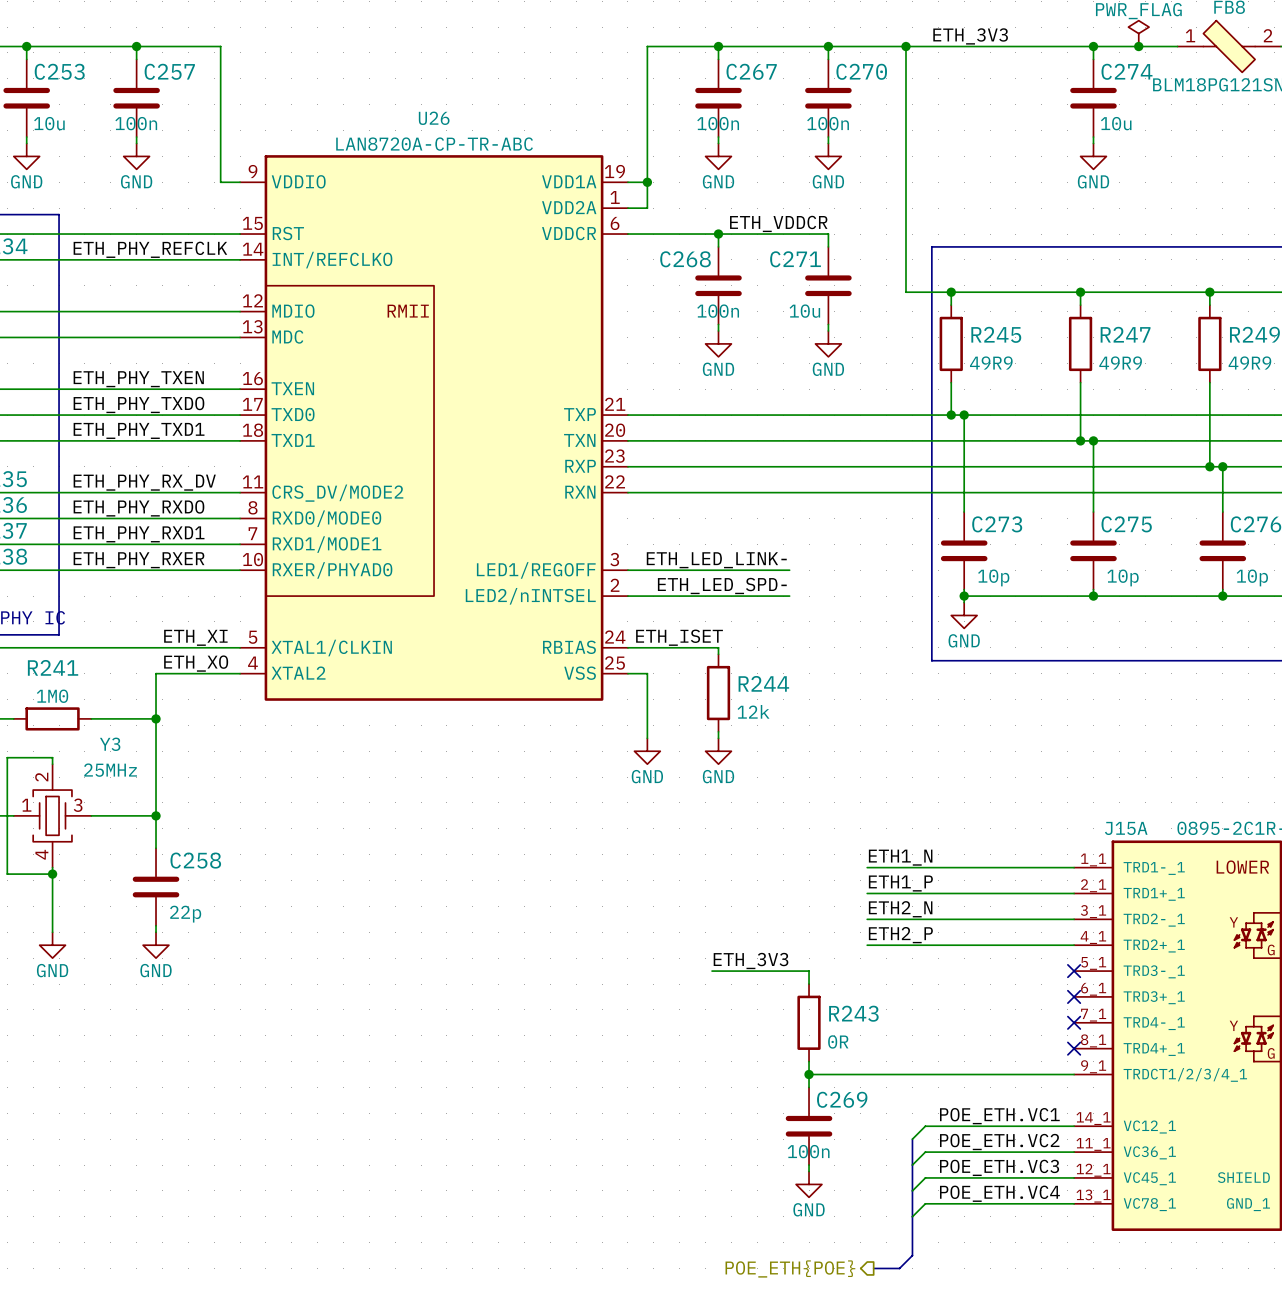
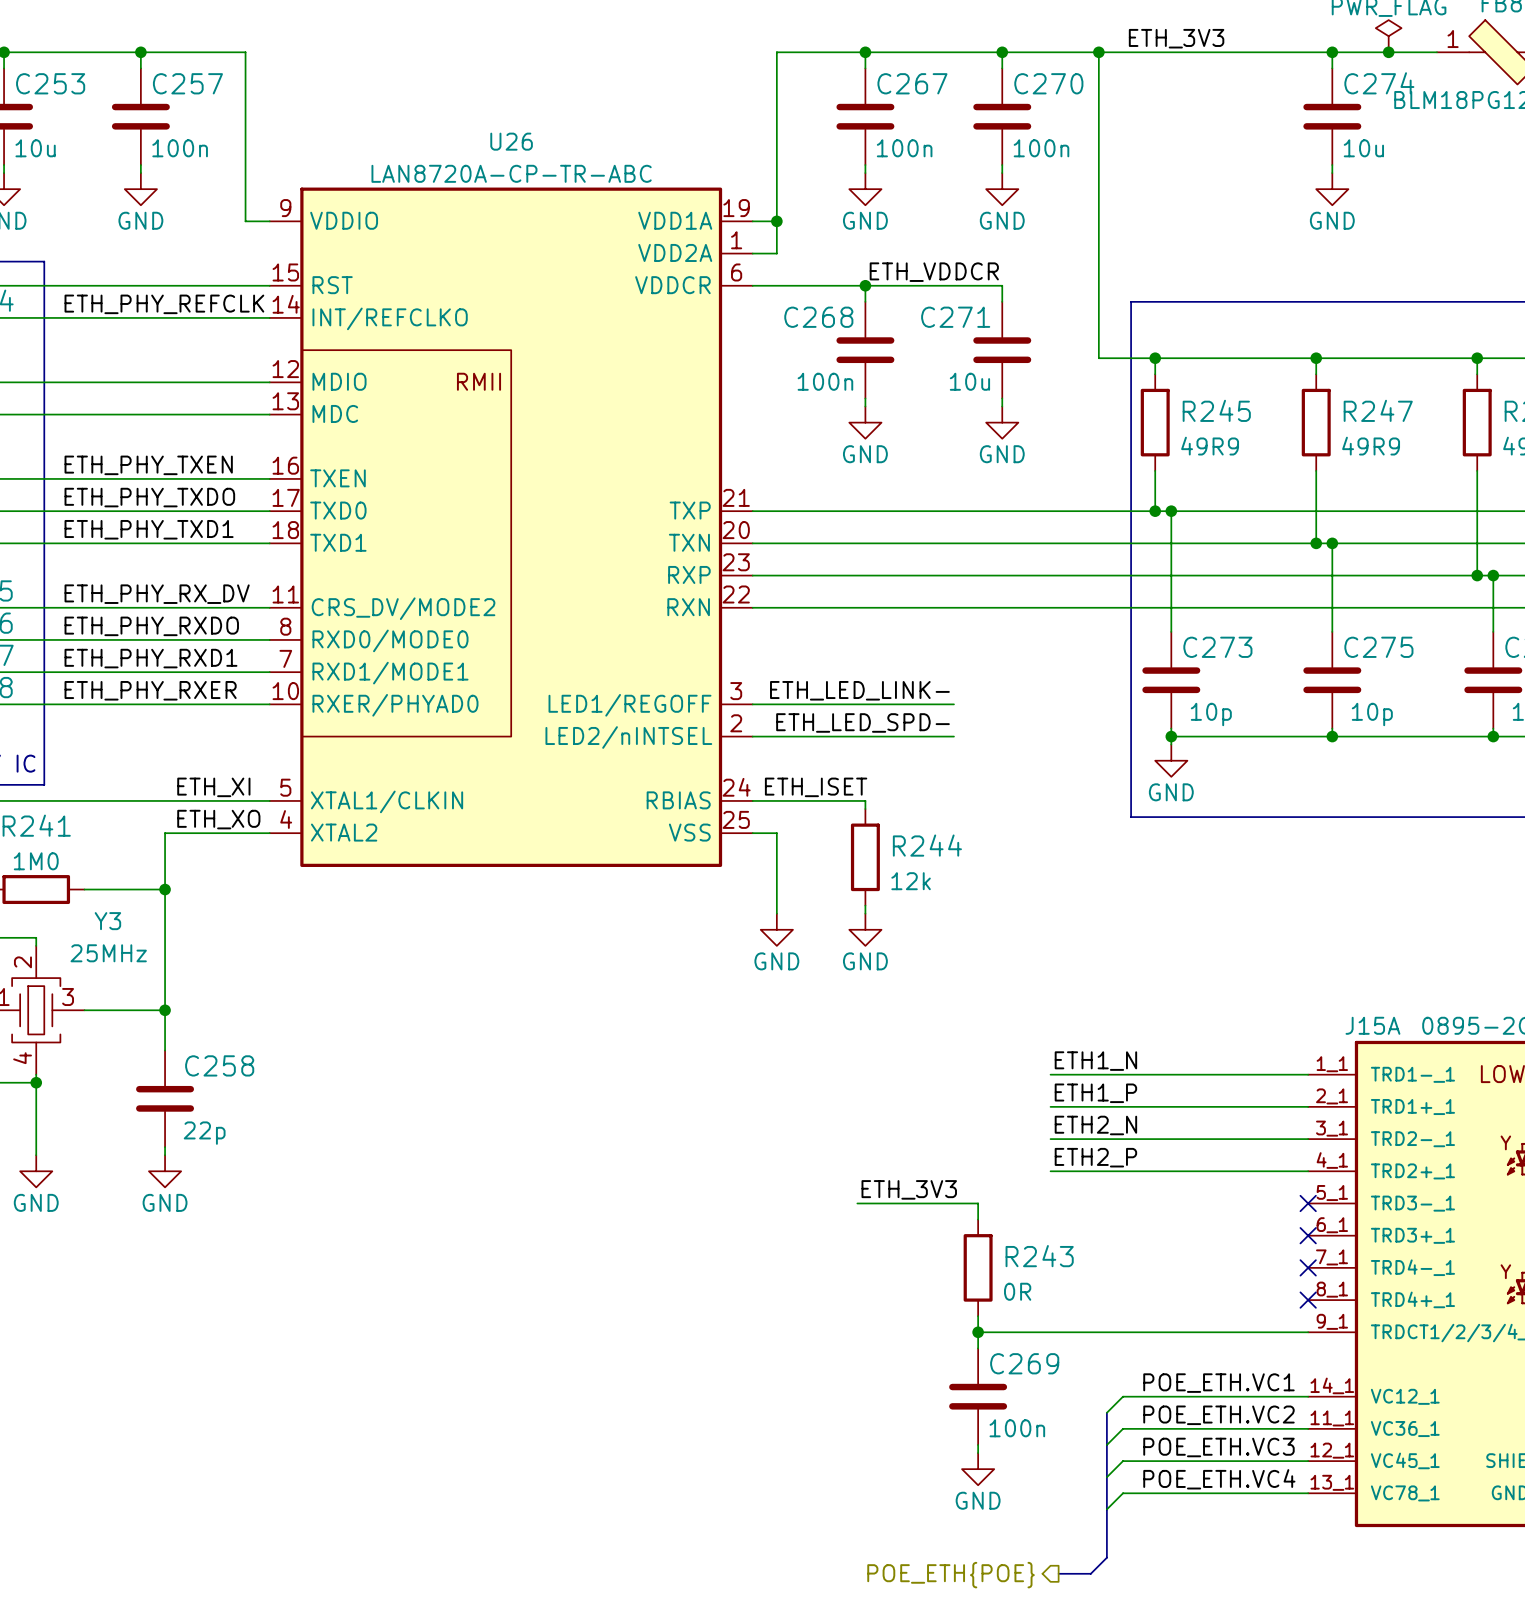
C257 text position: 100n (136, 123) -> 100n (180, 148)
C267 text position: 100n (718, 123) -> 100n (904, 148)
C270 text position: 100n (828, 123) -> 100n (1041, 148)
C268 text position: 100n (718, 311) -> 100n (825, 381)
C269 text position: 100n (808, 1151) -> 100n (1017, 1428)

